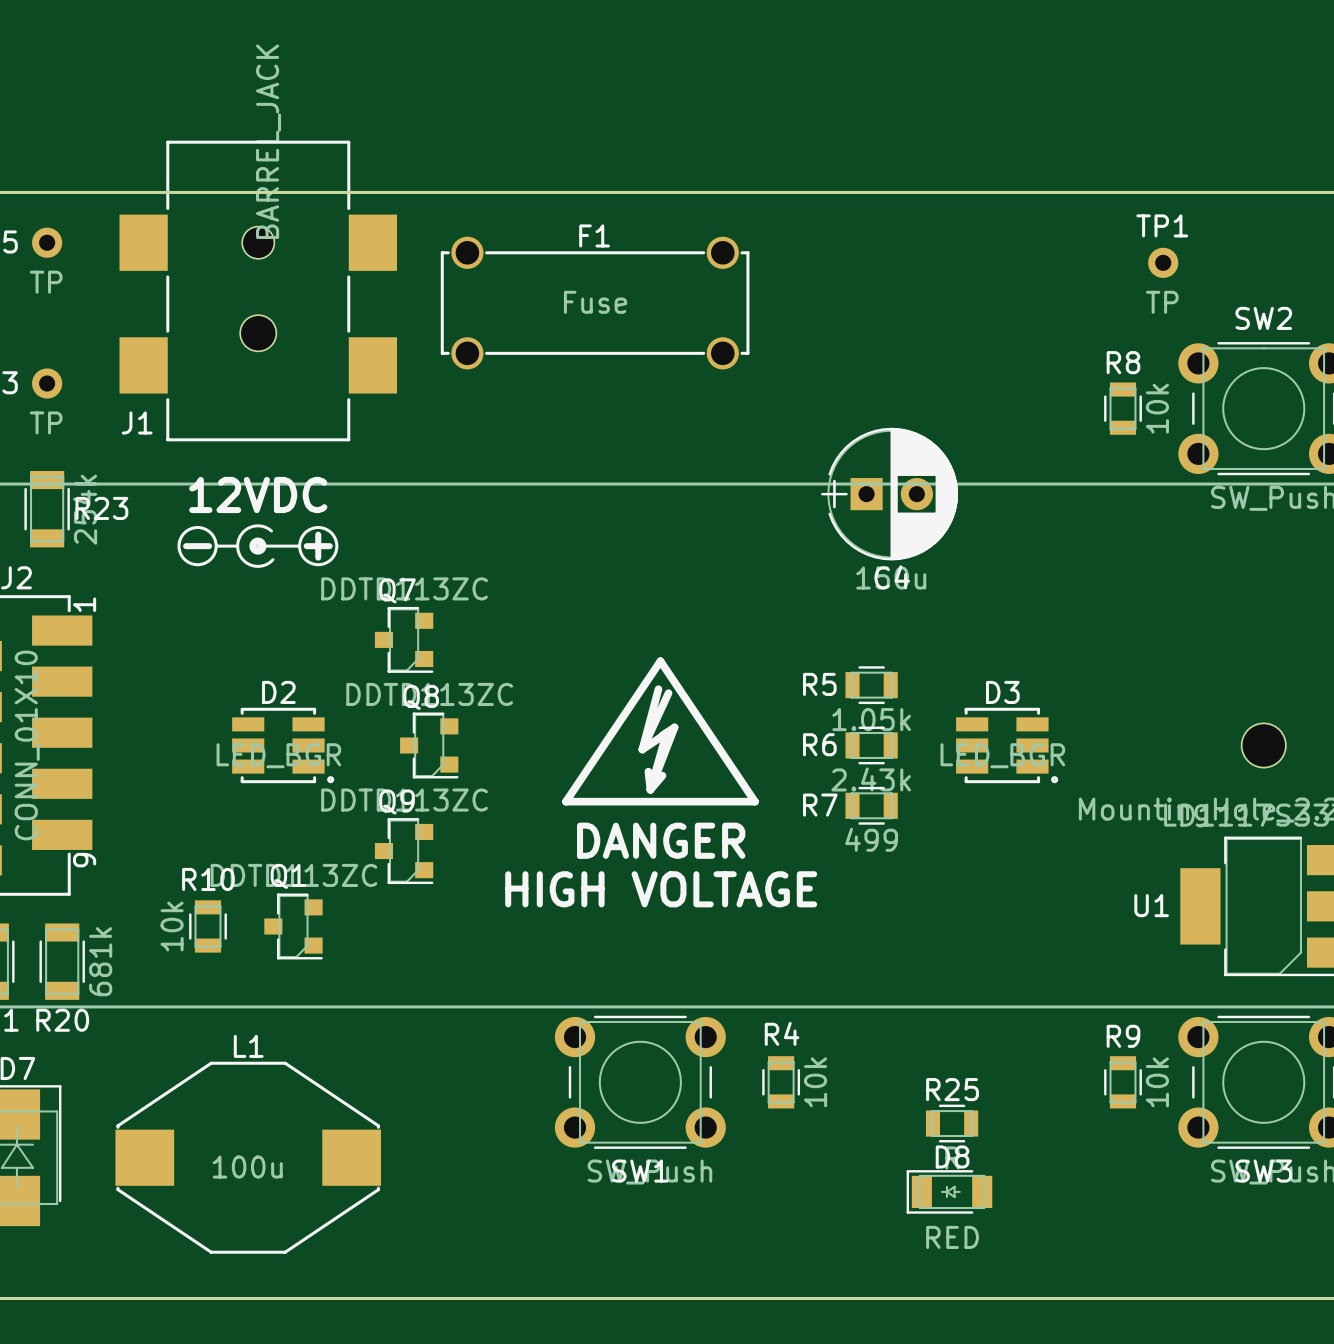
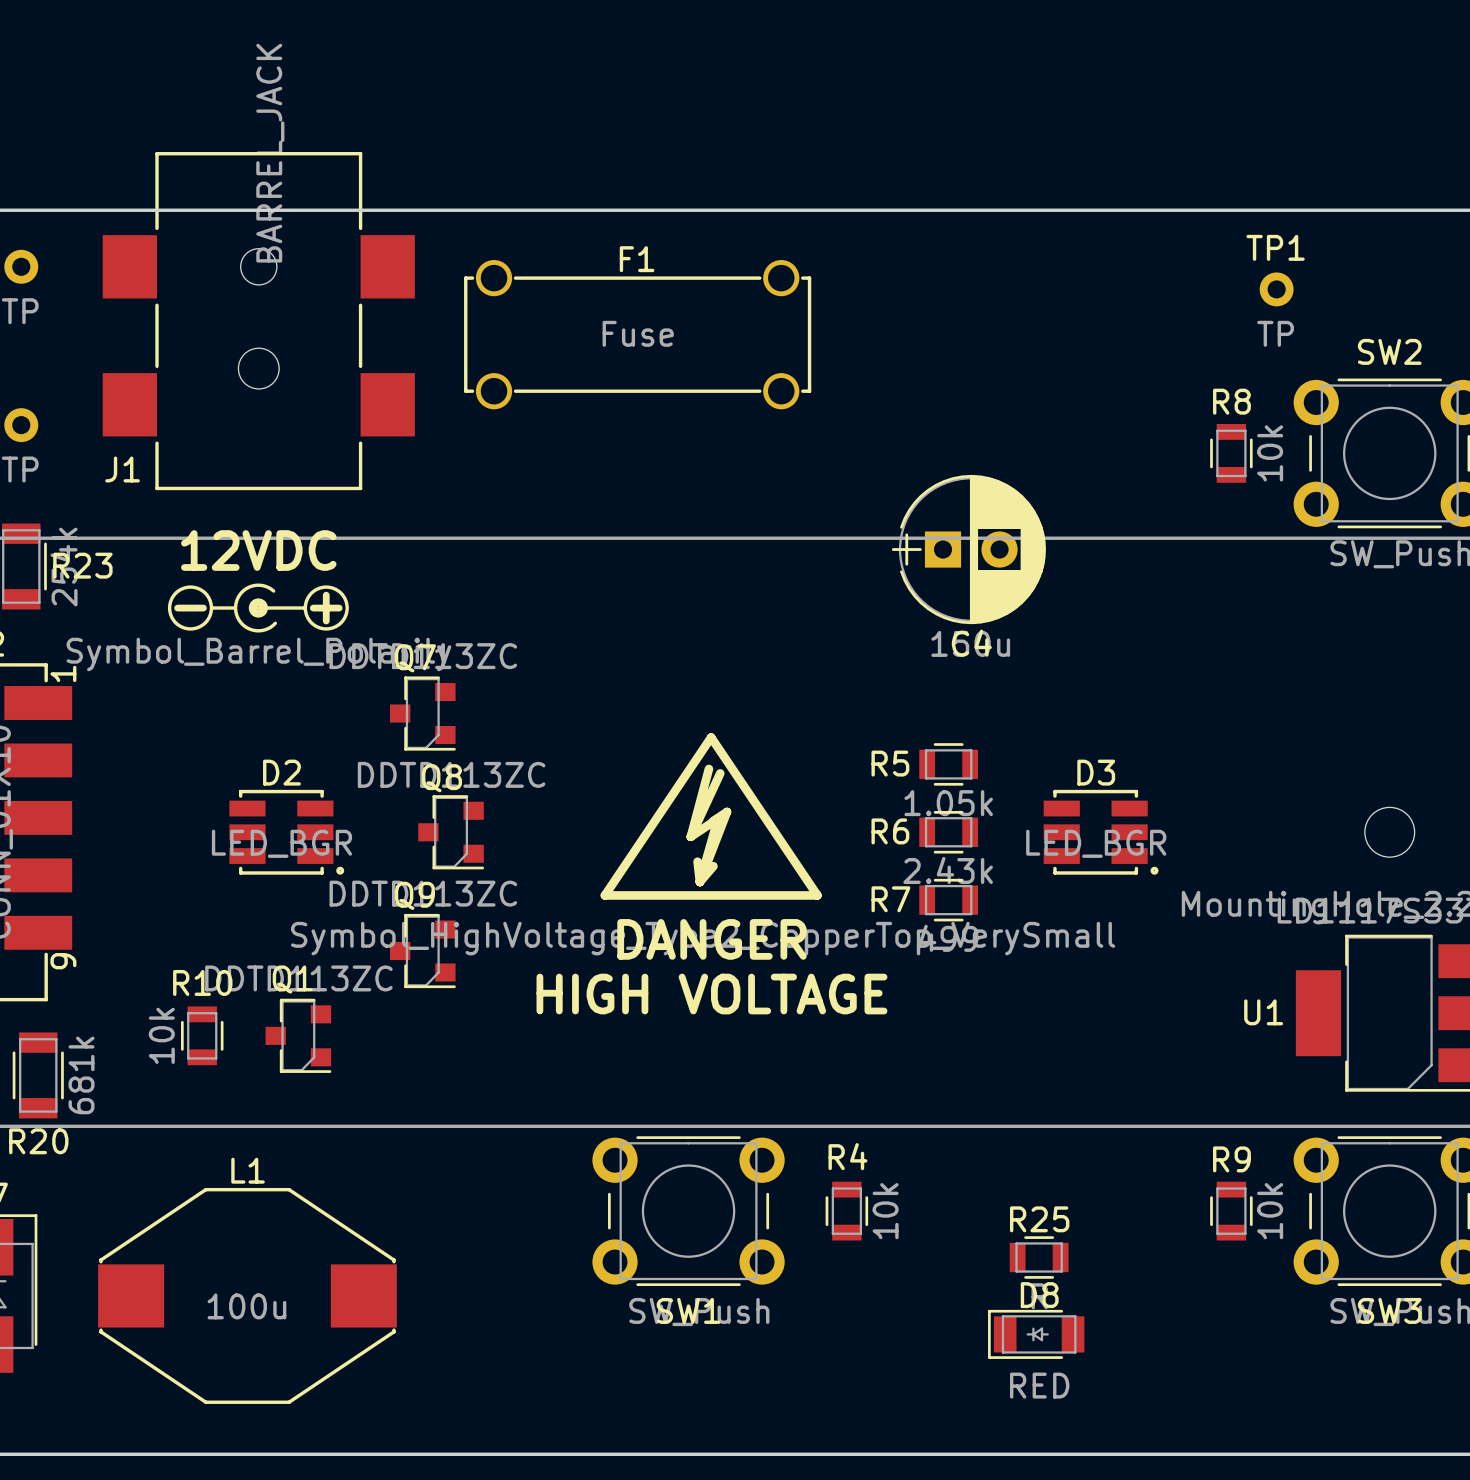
drawing shape: [177, 524, 339, 568] -> [66, 583, 452, 672]
drawing shape: [562, 657, 759, 806] -> [291, 733, 1116, 956]

